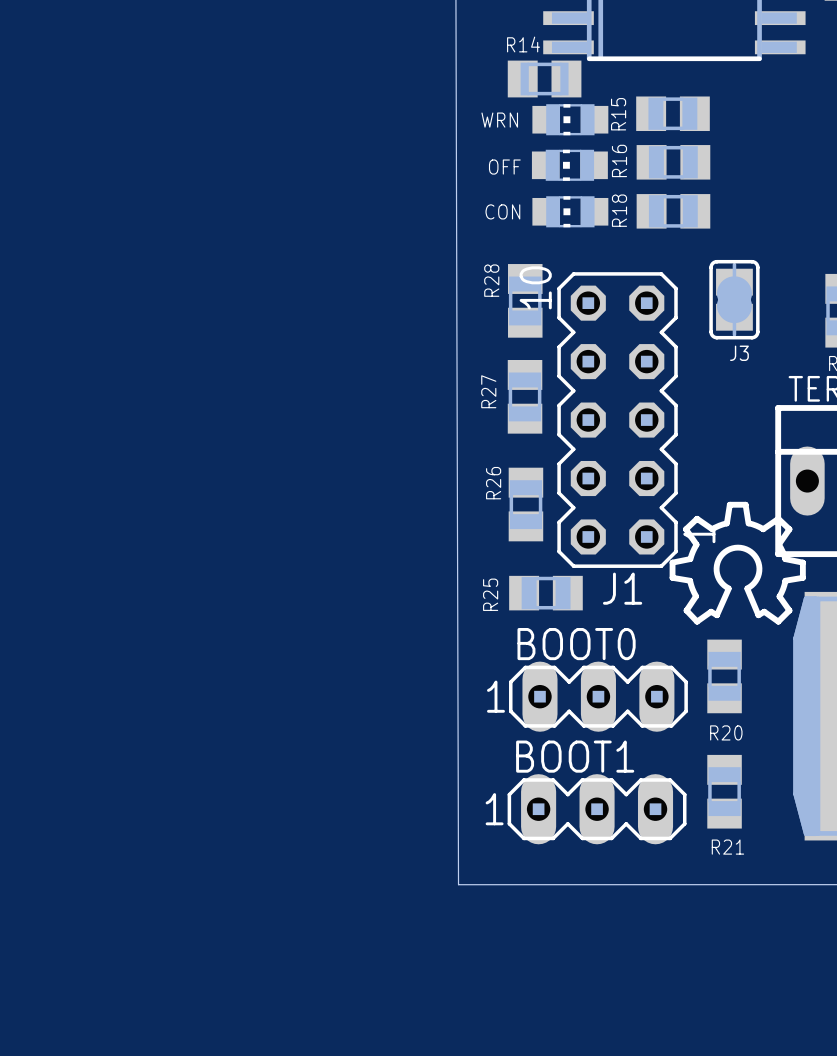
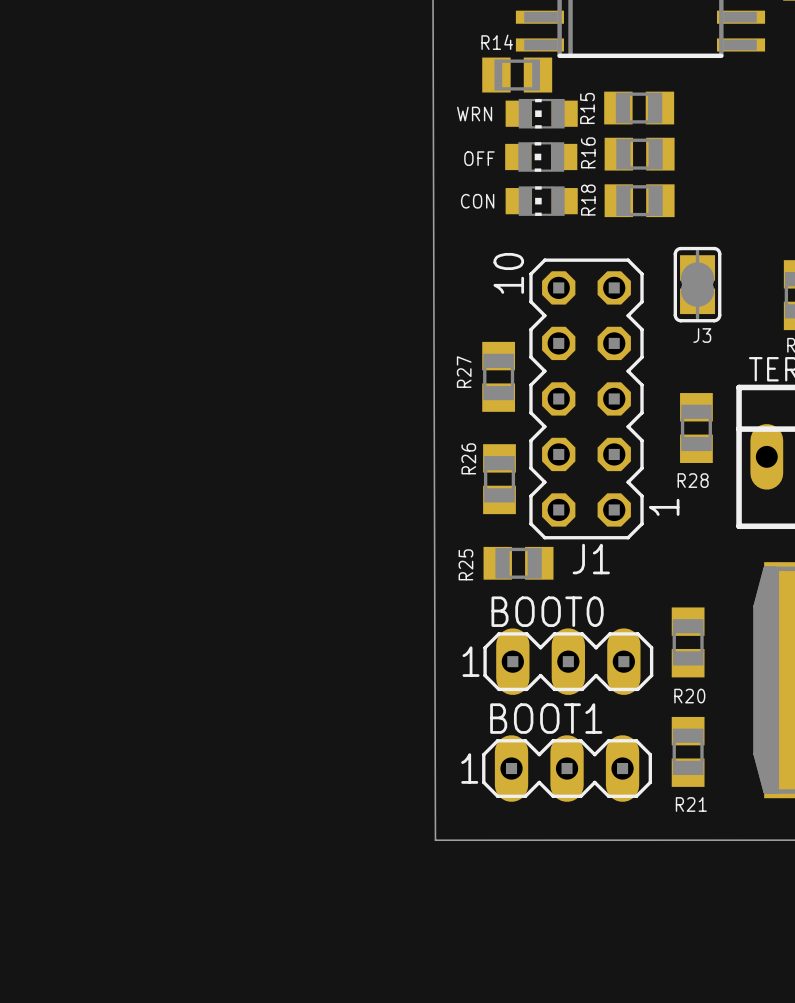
R28 name rotation: 0° (491, 280) -> 90° clockwise (693, 480)
R28 name position: R28 (491, 280) -> R28 (693, 480)
R28 position: (525, 300) -> (696, 428)
drawing: [669, 501, 806, 625] -> none

